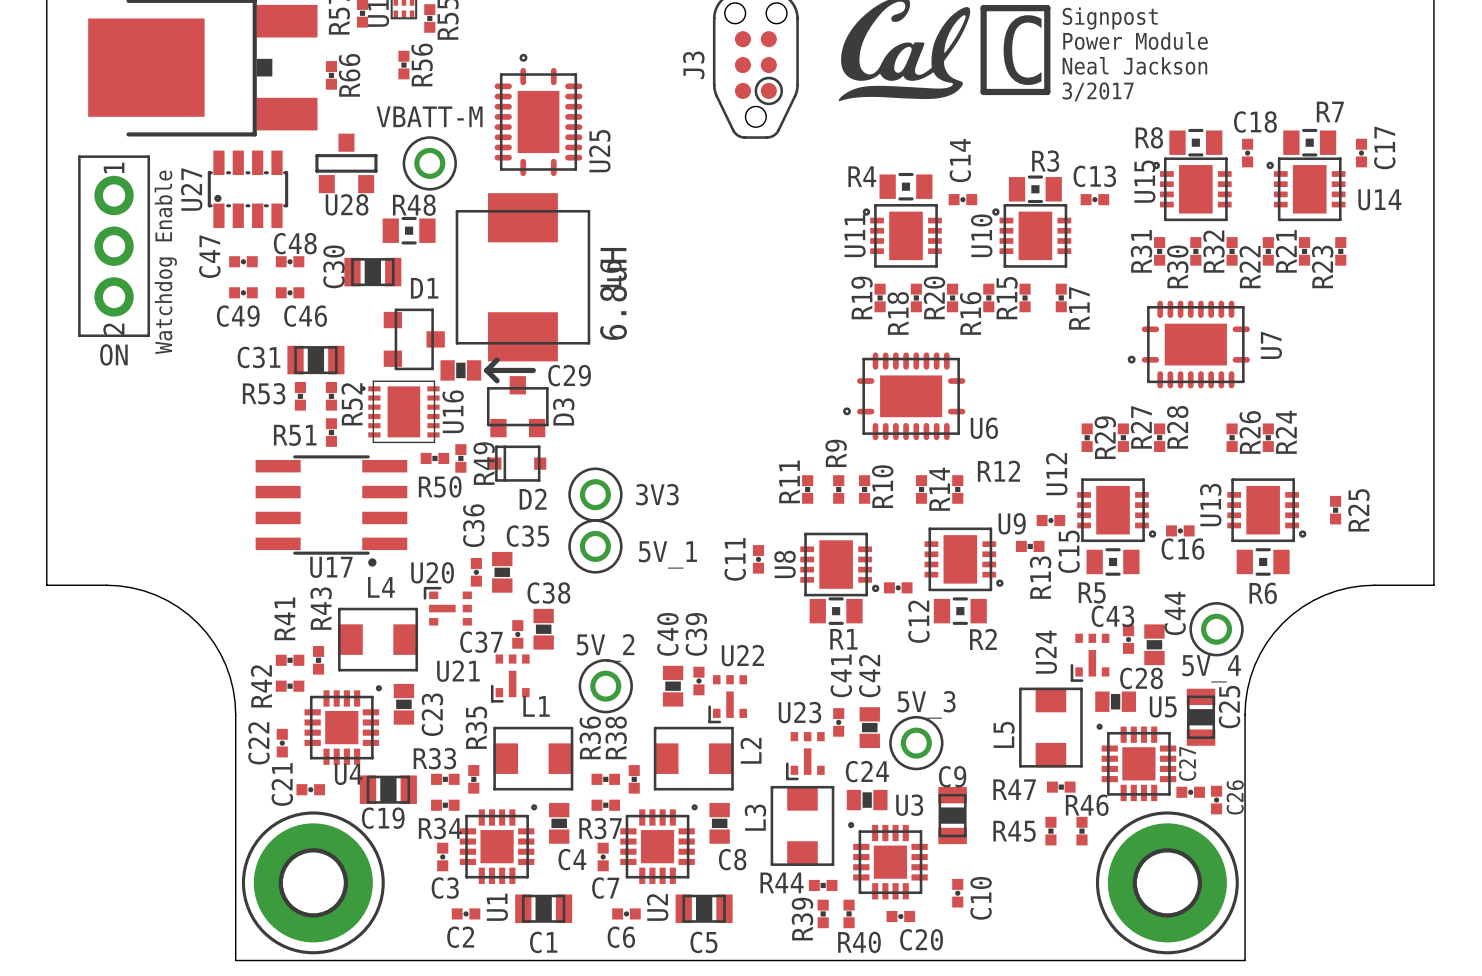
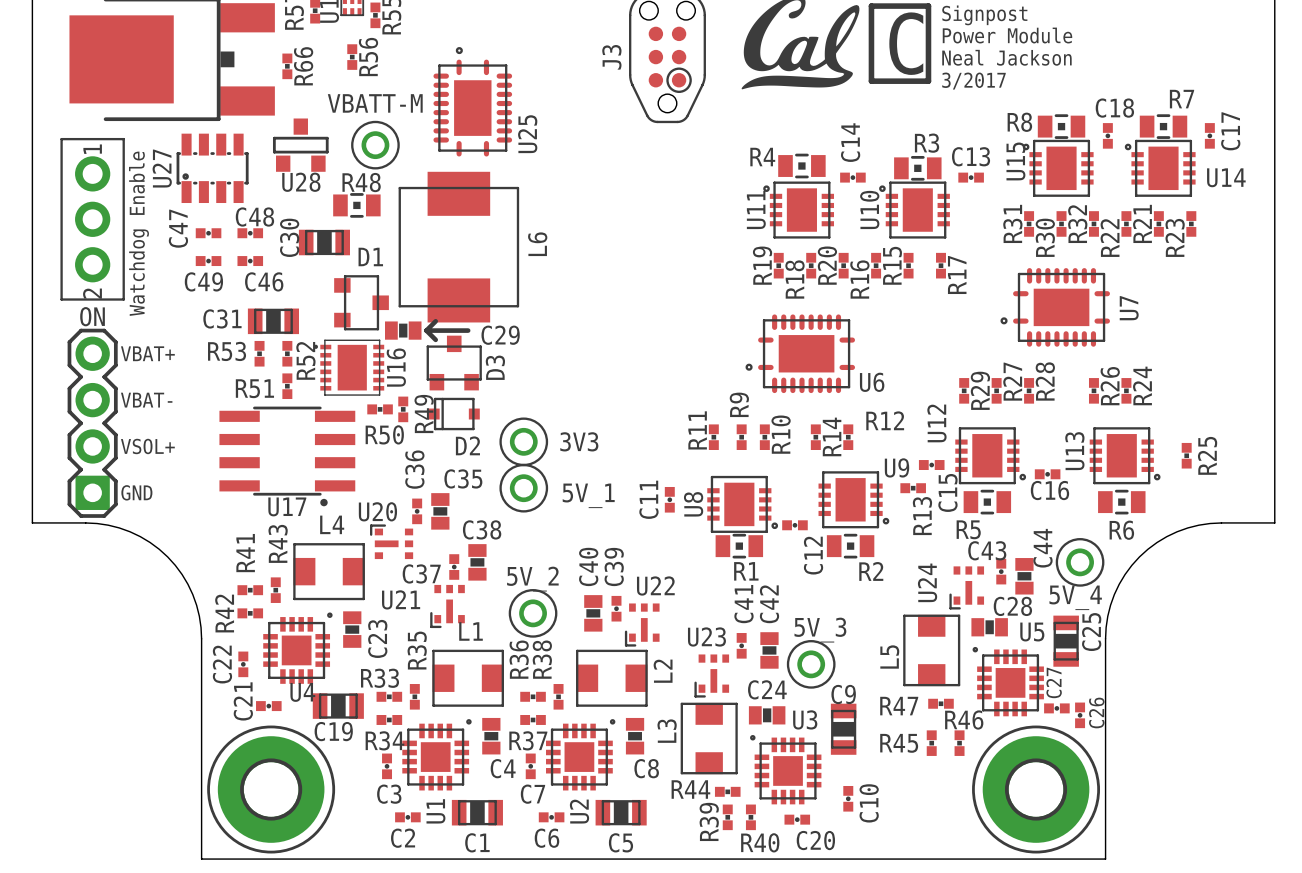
L6 value: 6.8uH (613, 293) -> none
text: none -> VBAT+ (147, 353)
text: none -> VBAT- (146, 400)
part: none -> (92, 423)
text: none -> VSOL+ (147, 446)
text: none -> GND (136, 492)

